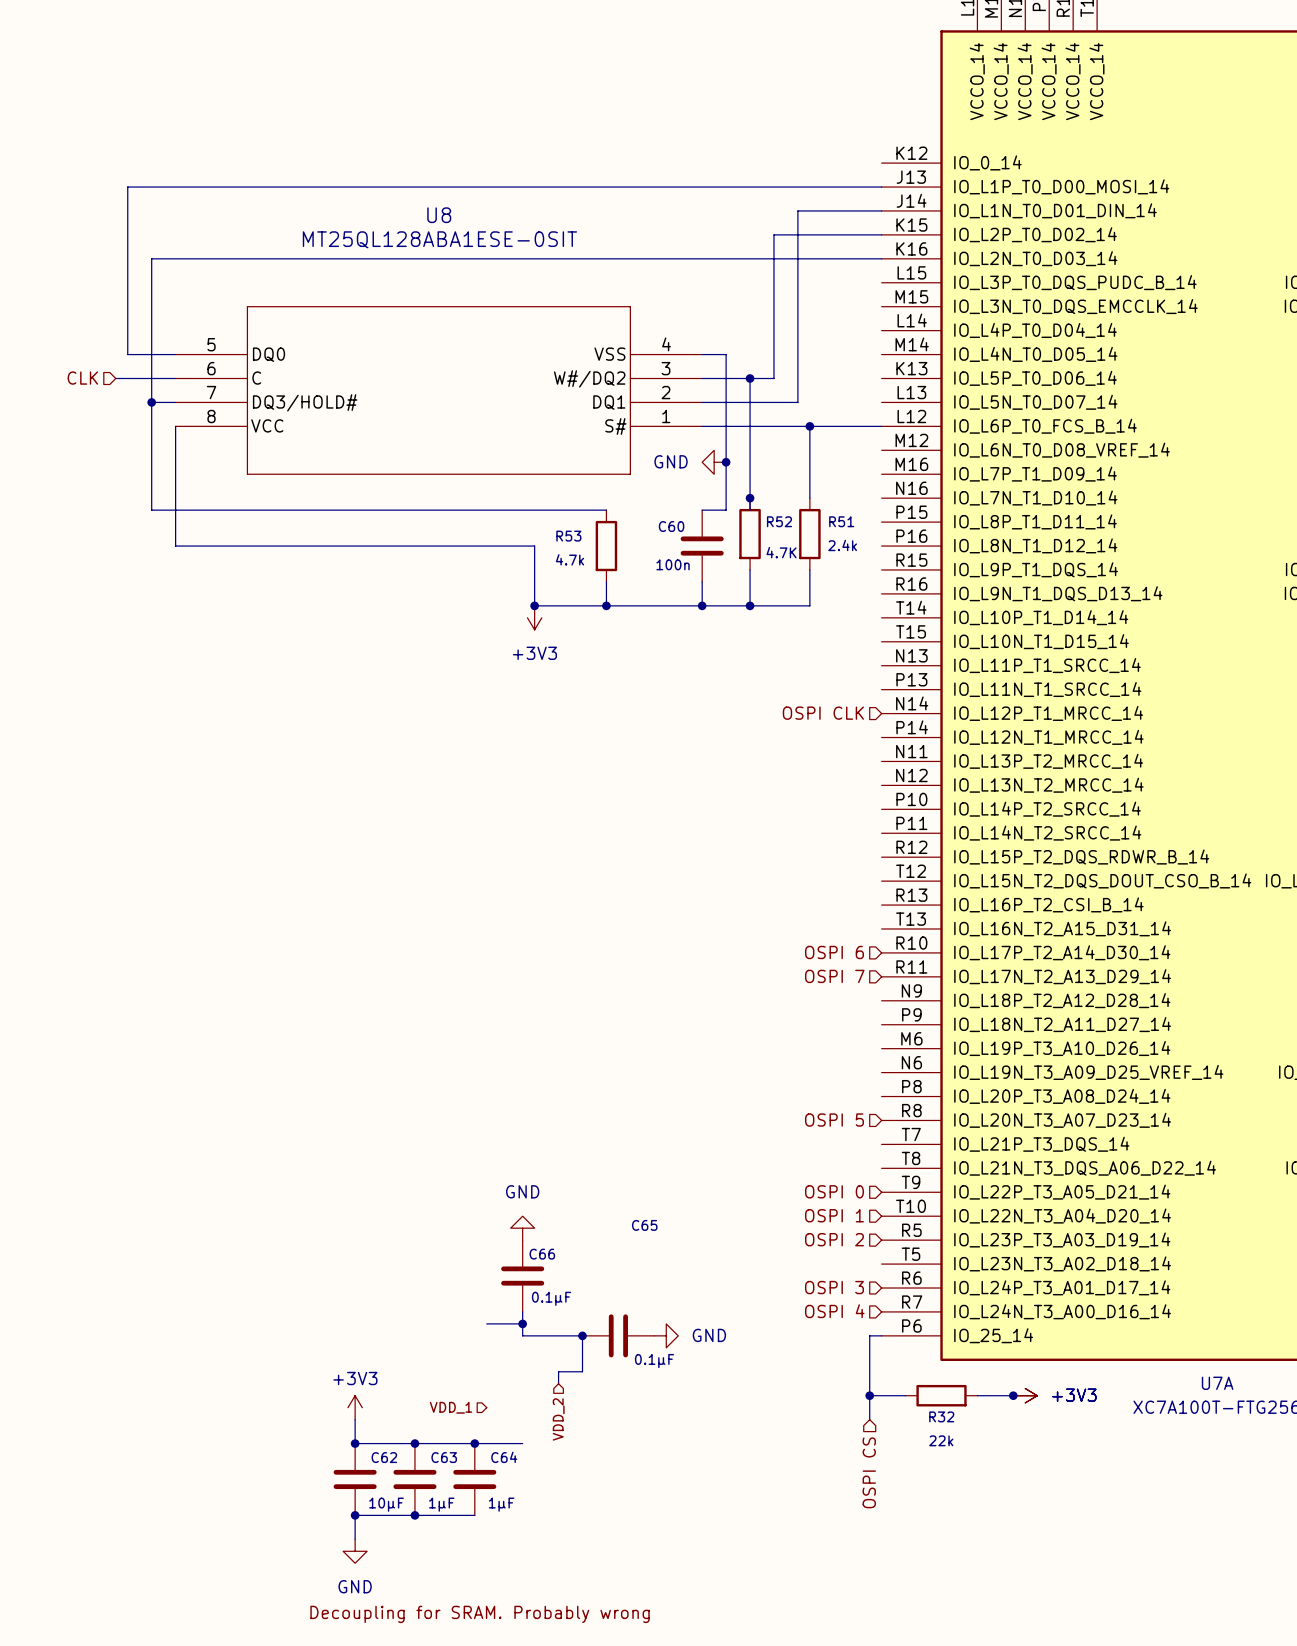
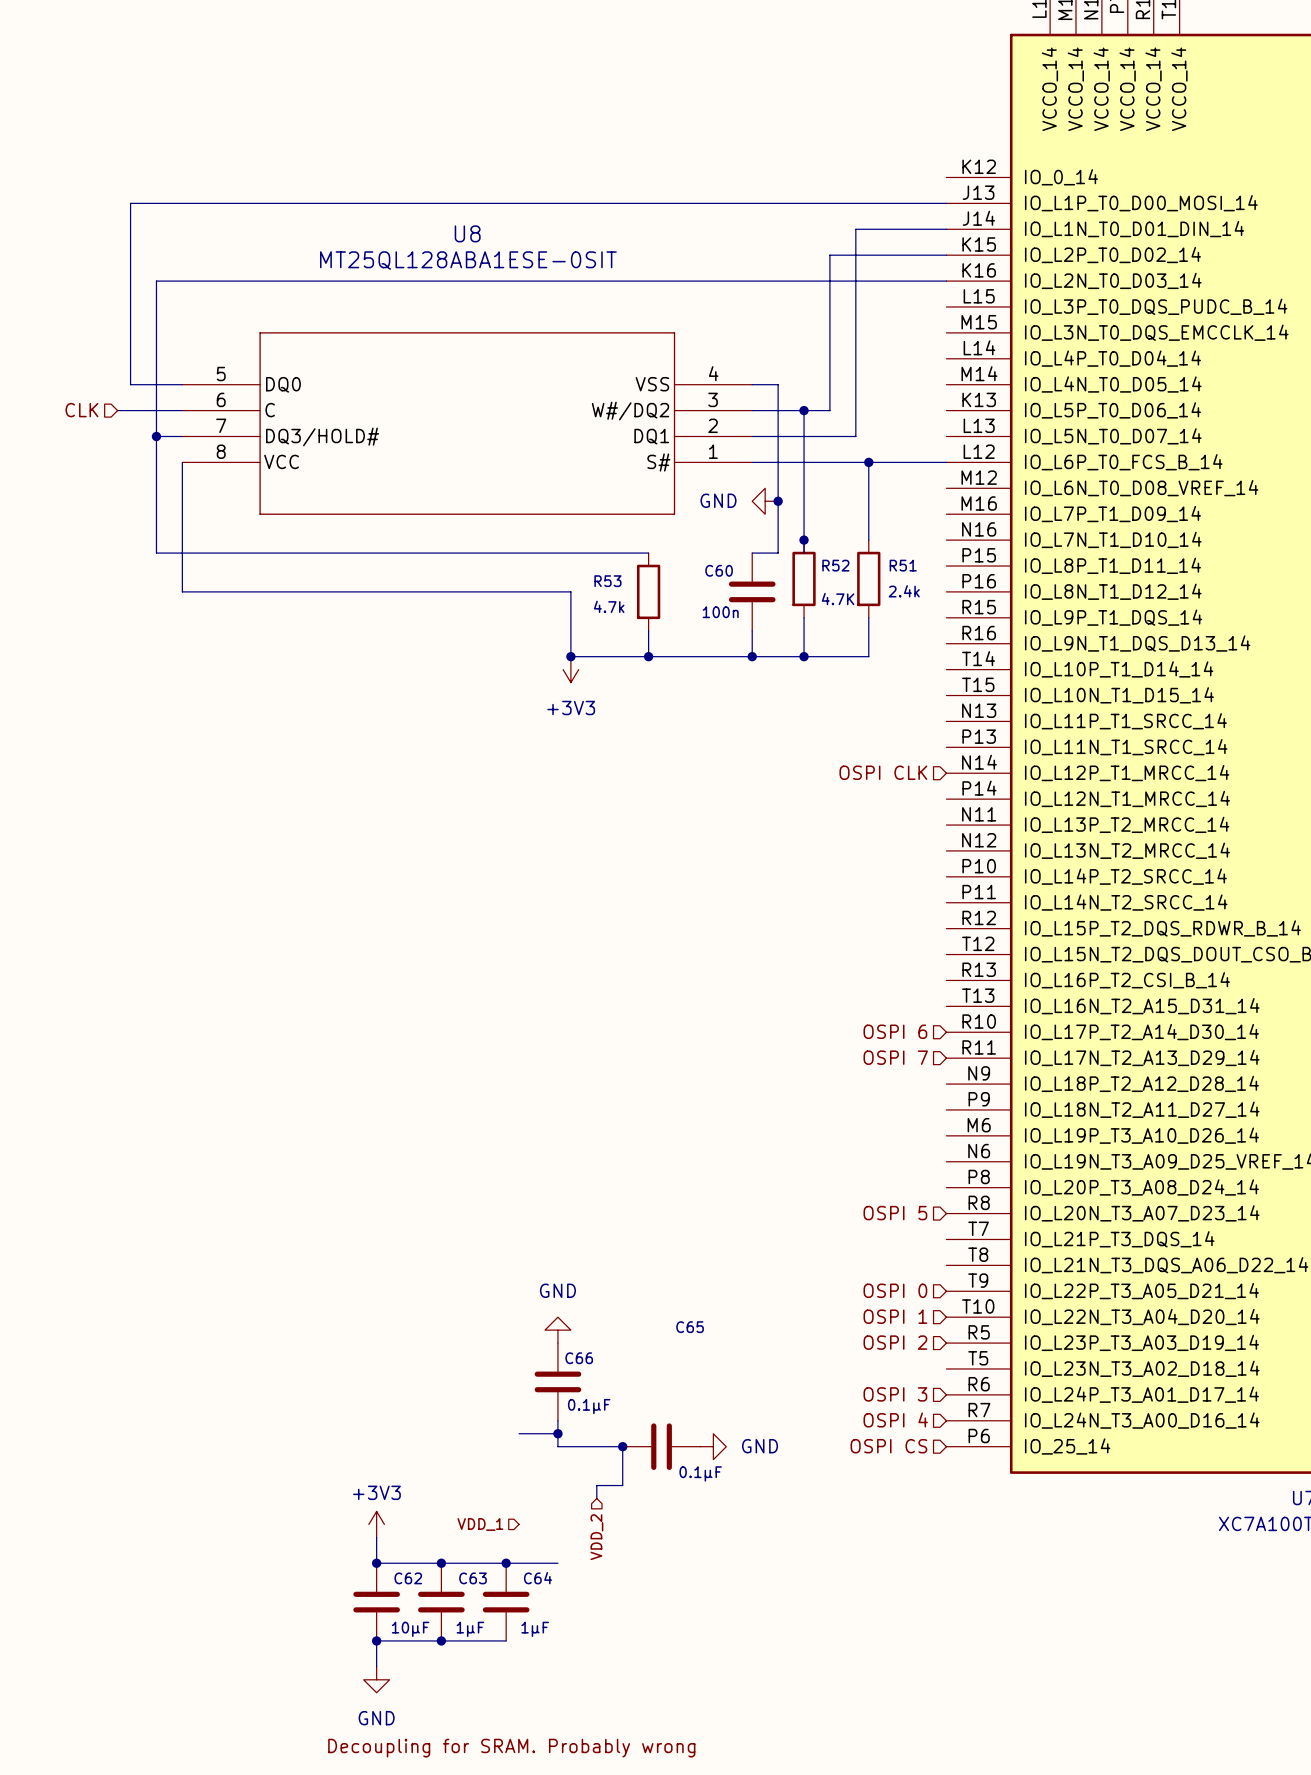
wire: (881, 1335) (869, 1335) (869, 1419) -> none
wire: (869, 1395) (905, 1395) -> none
junction: (869, 1395) -> none
R32: 22k (941, 1395) -> none
wire: (977, 1395) (1013, 1395) -> none
junction: (1013, 1395) -> none
power symbol: +3V3 (1025, 1395) -> none
hierarchical label rotation: 0° (869, 1472) -> 90° clockwise (888, 1446)
hierarchical label position: OSPI CS (869, 1472) -> OSPI CS (888, 1446)

